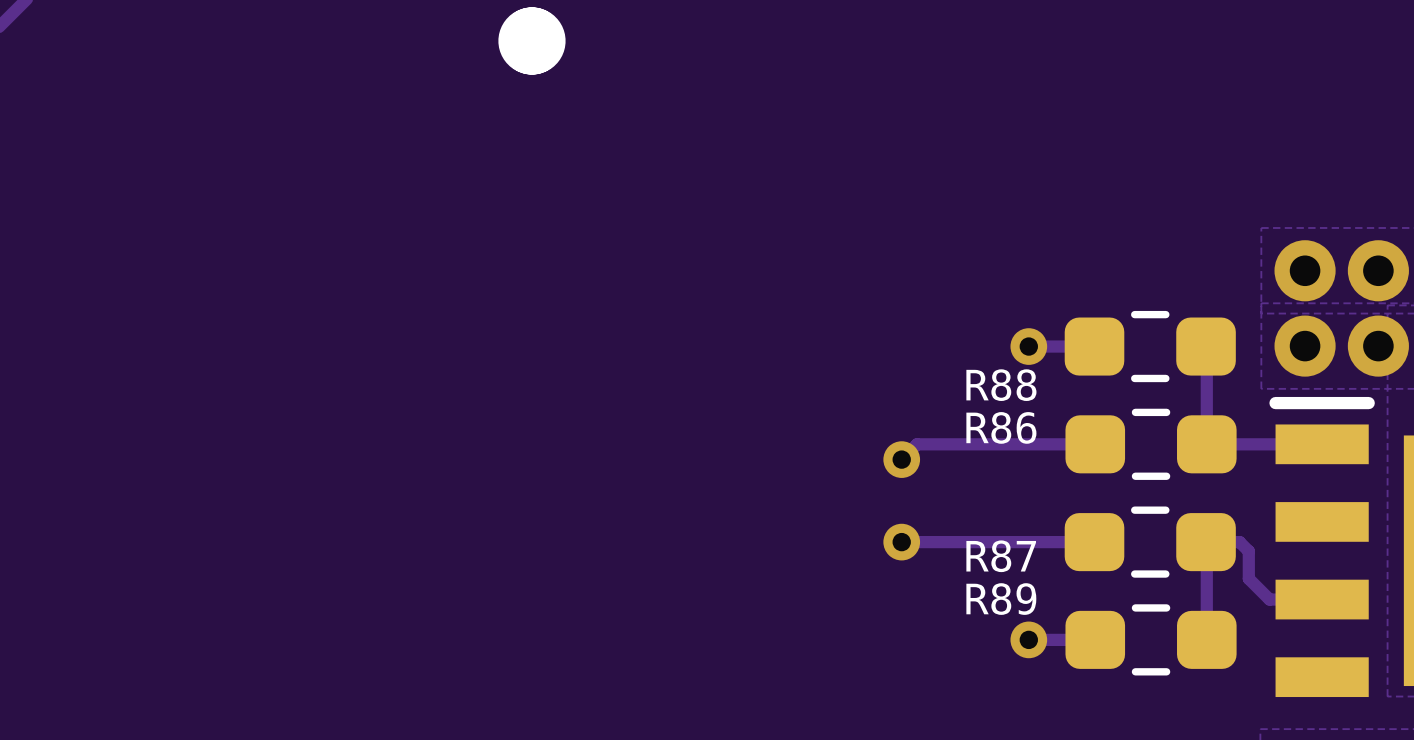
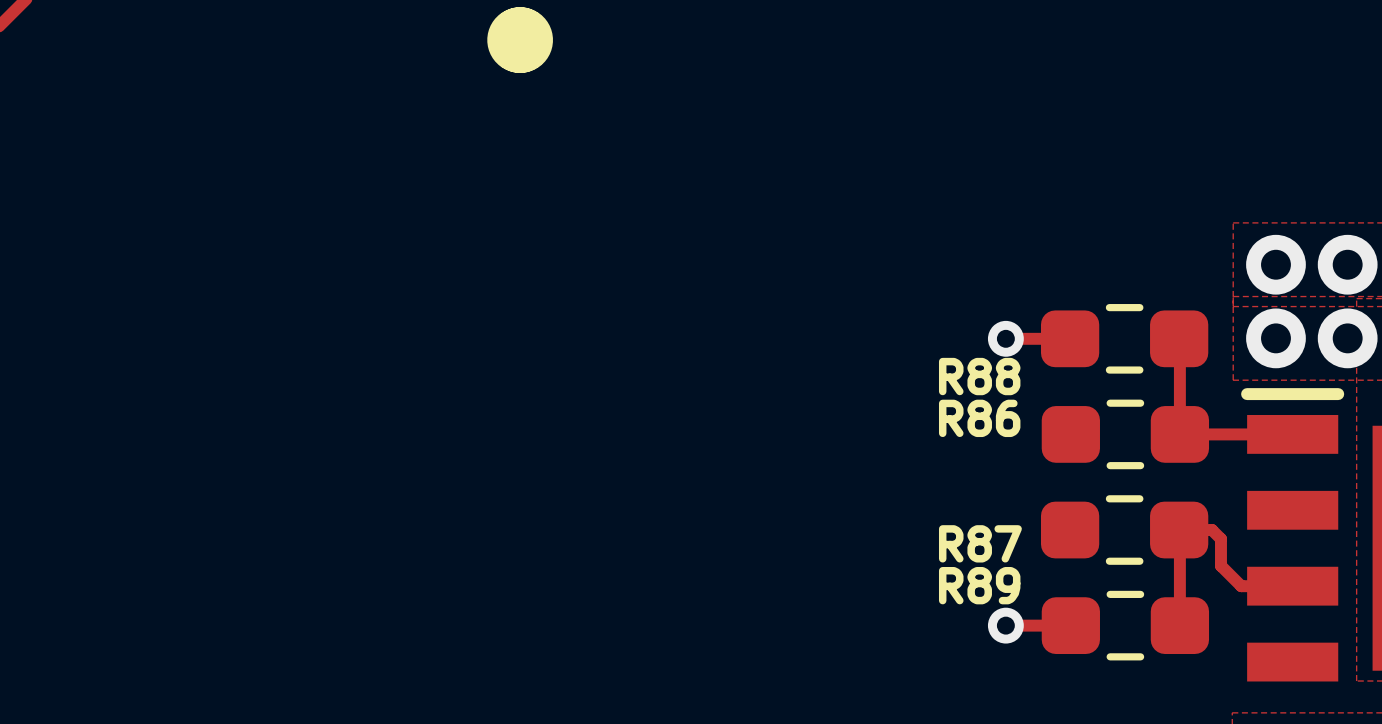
track: (1095, 444) (916, 444) (901, 459) -> none
via: (901, 459) -> none
track: (901, 542) (1094, 542) -> none
via: (901, 542) -> none

